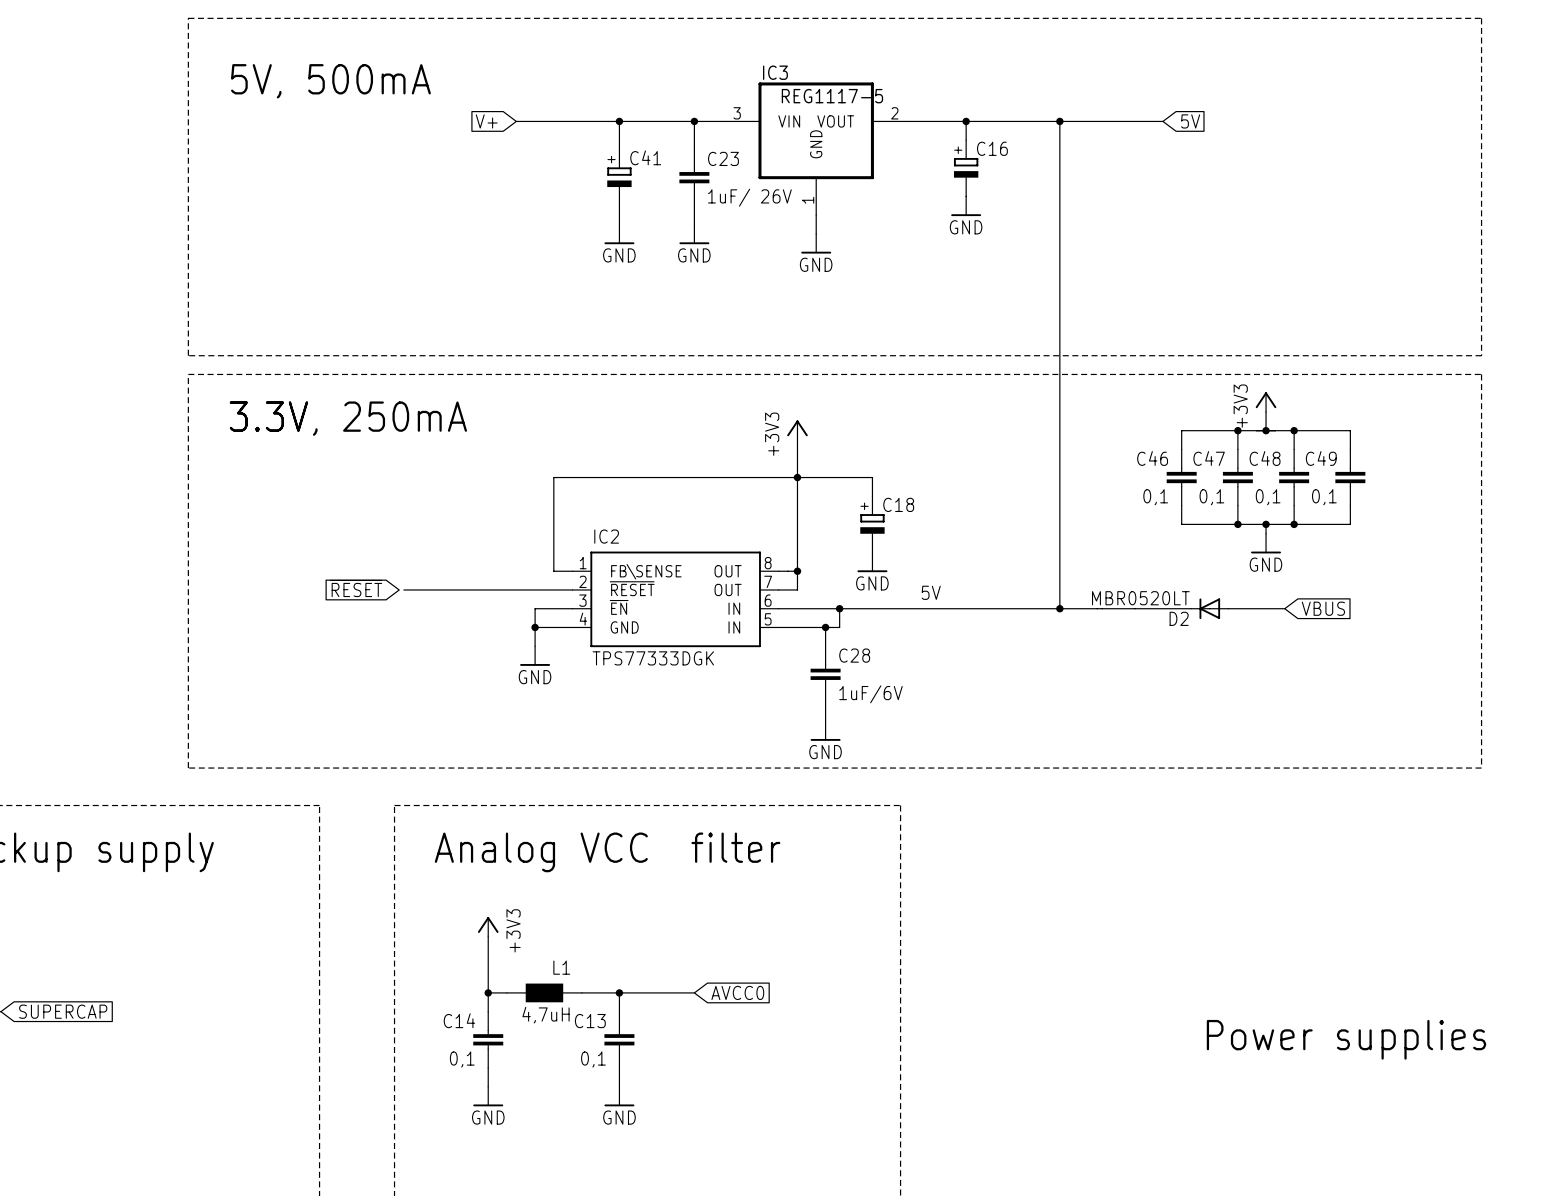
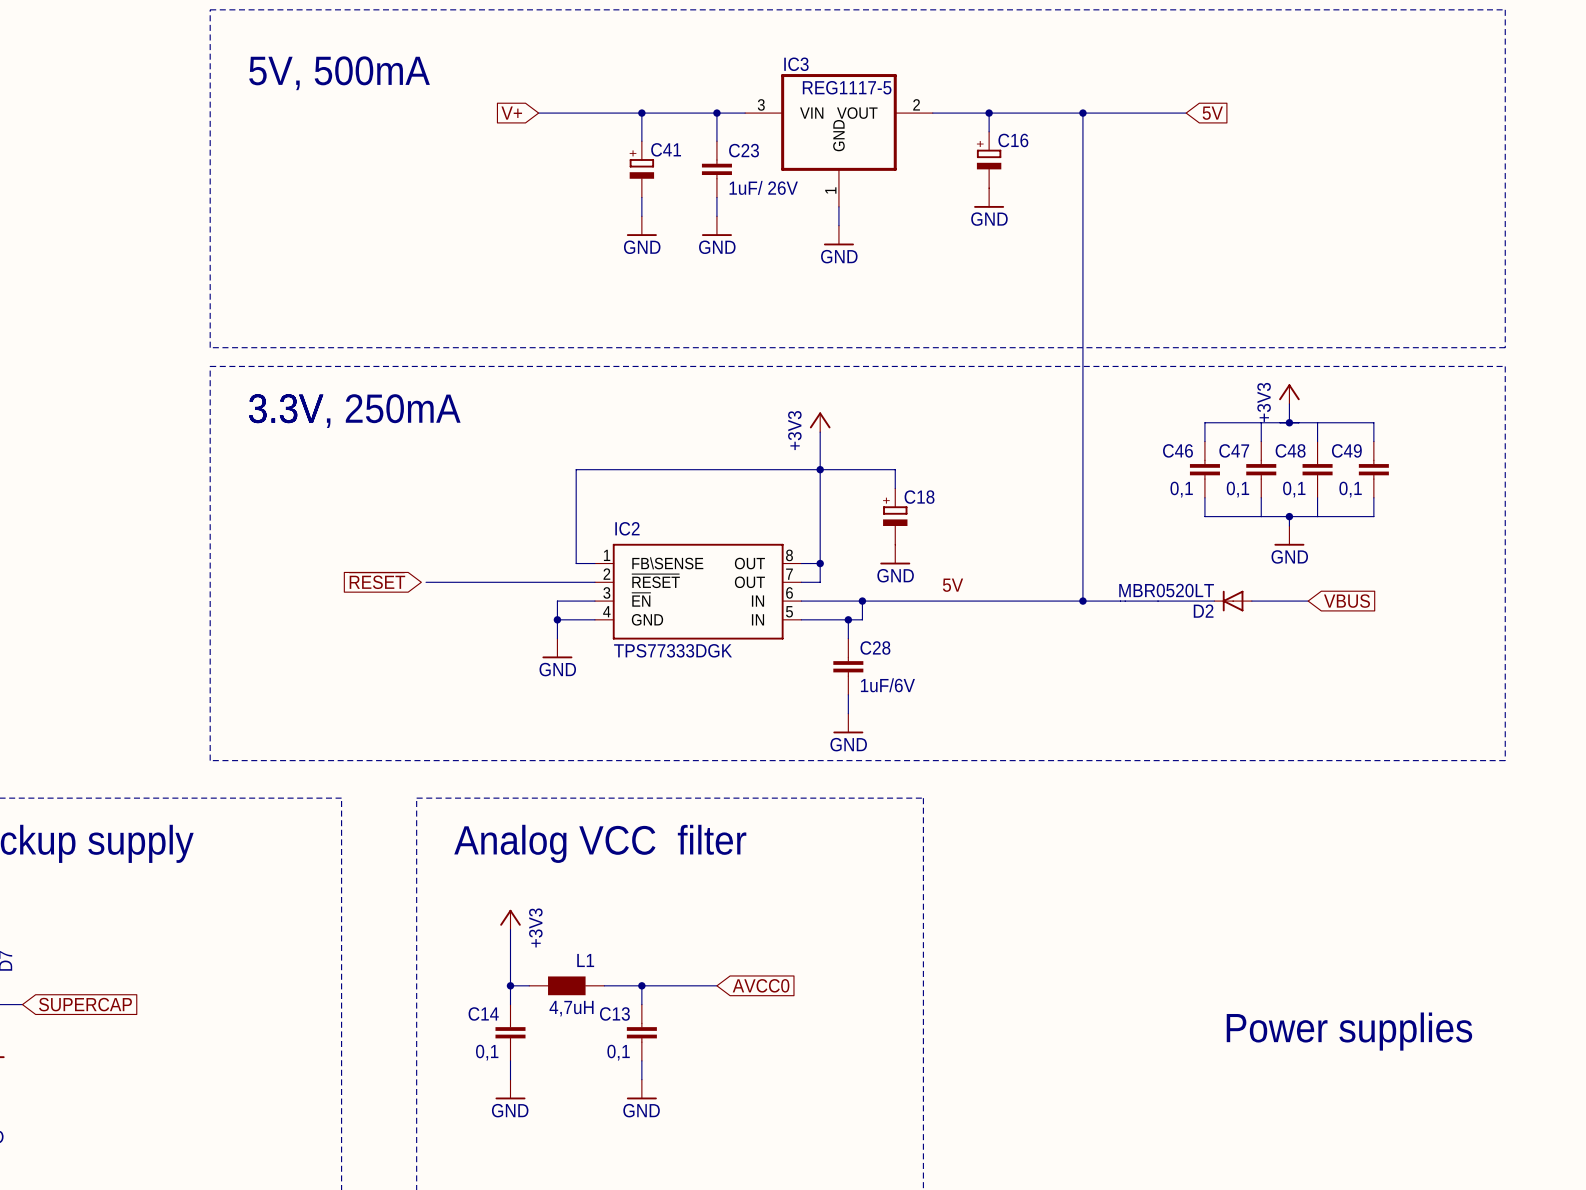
junction: (1237, 430) -> none
junction: (1294, 430) -> none
junction: (1237, 524) -> none
junction: (1294, 524) -> none

